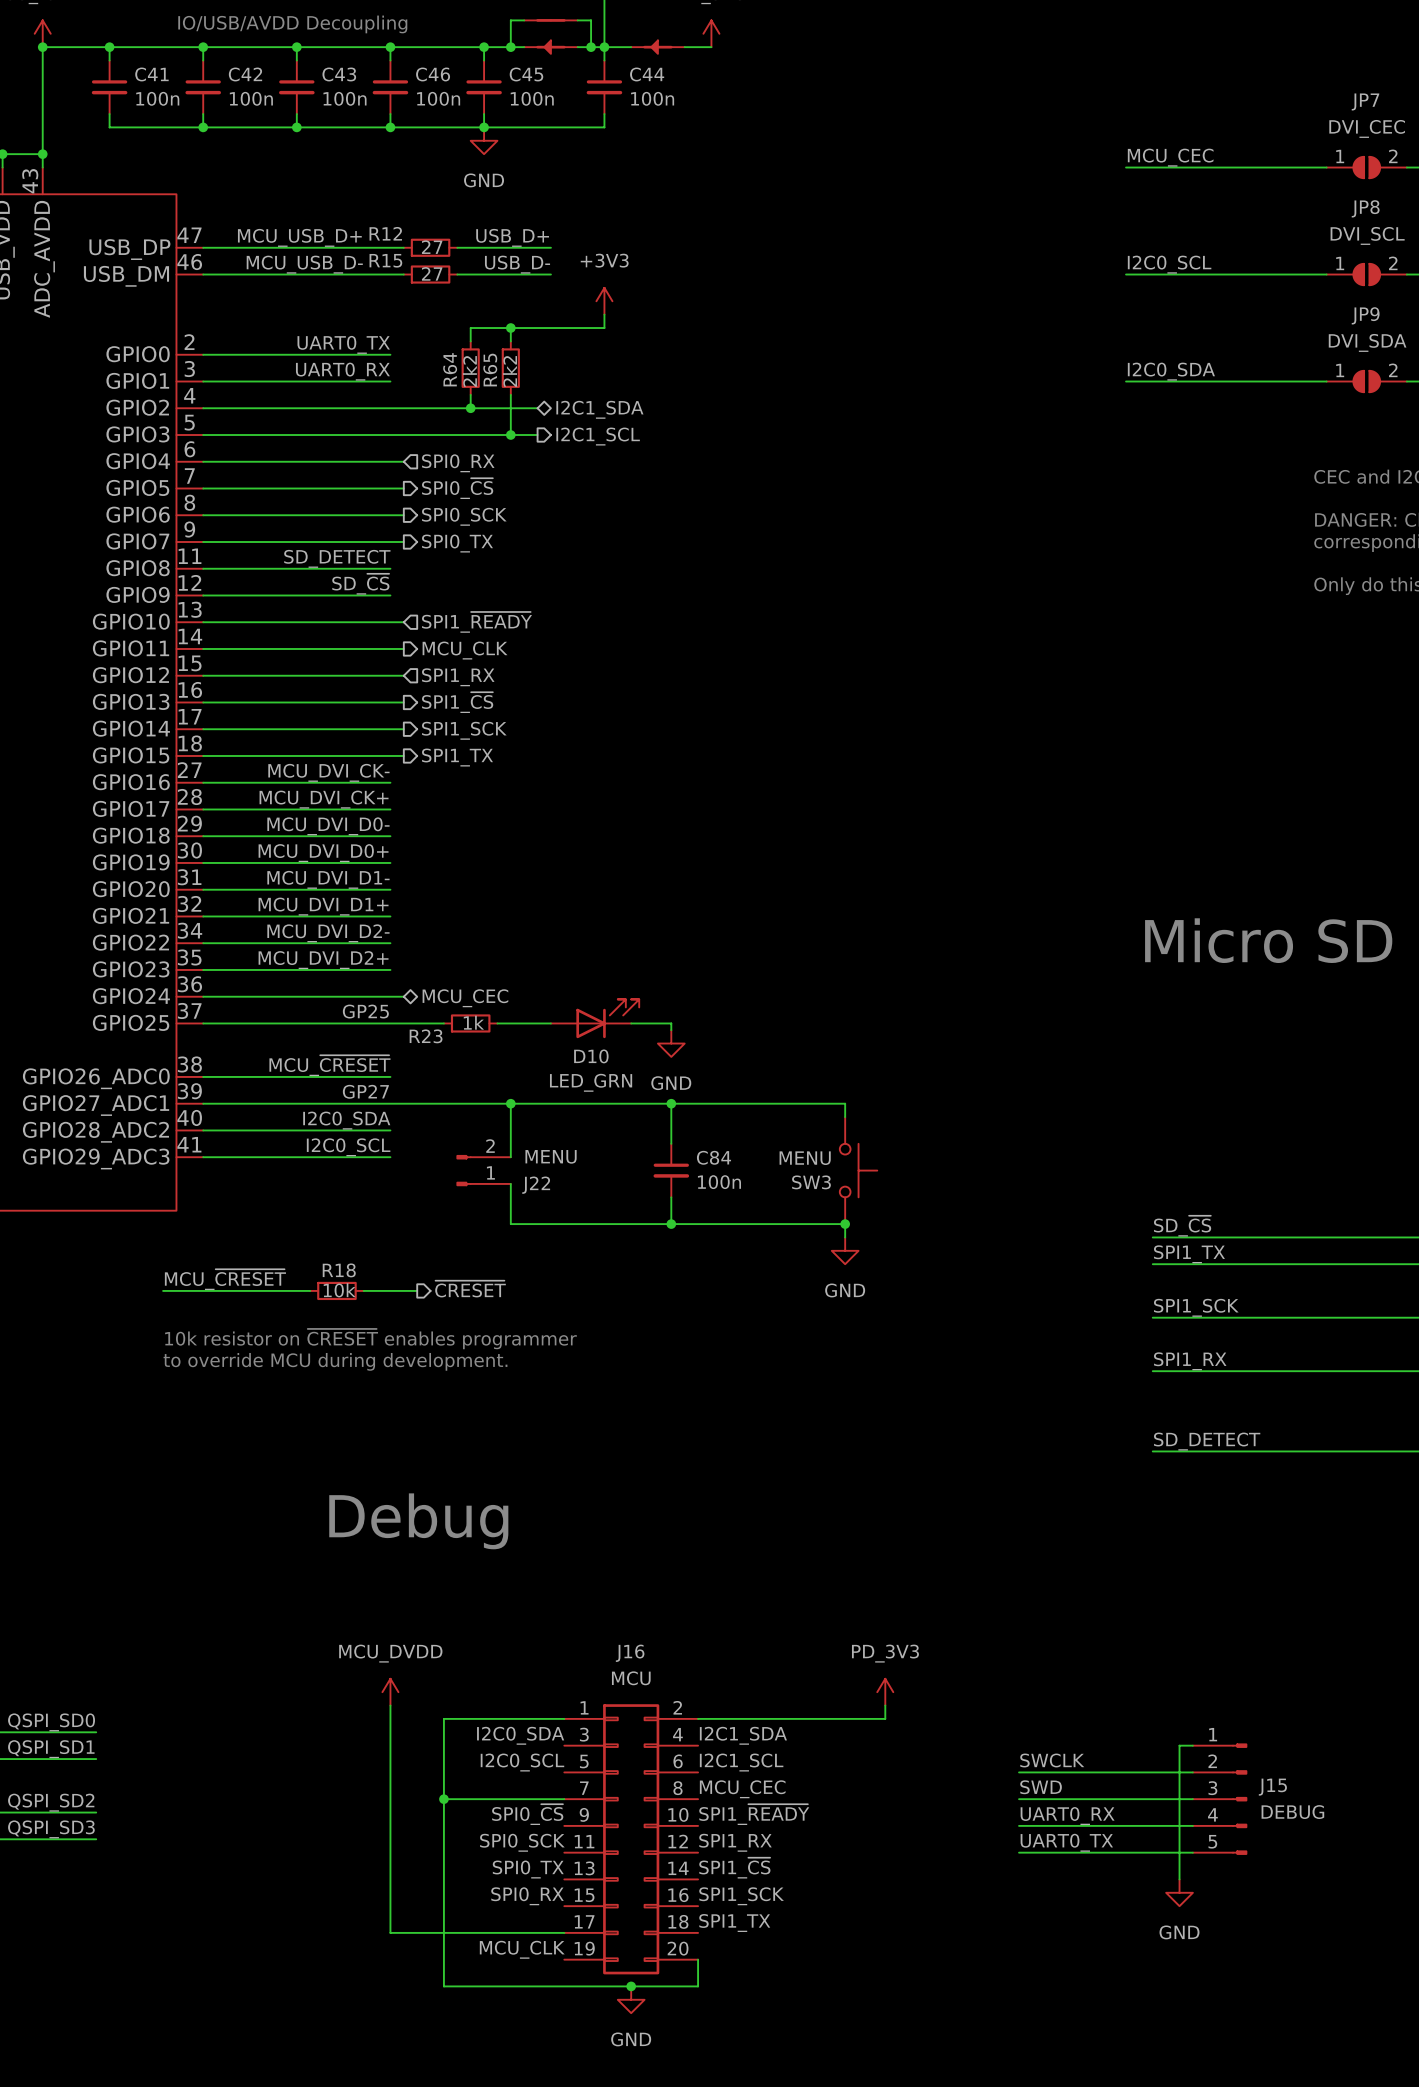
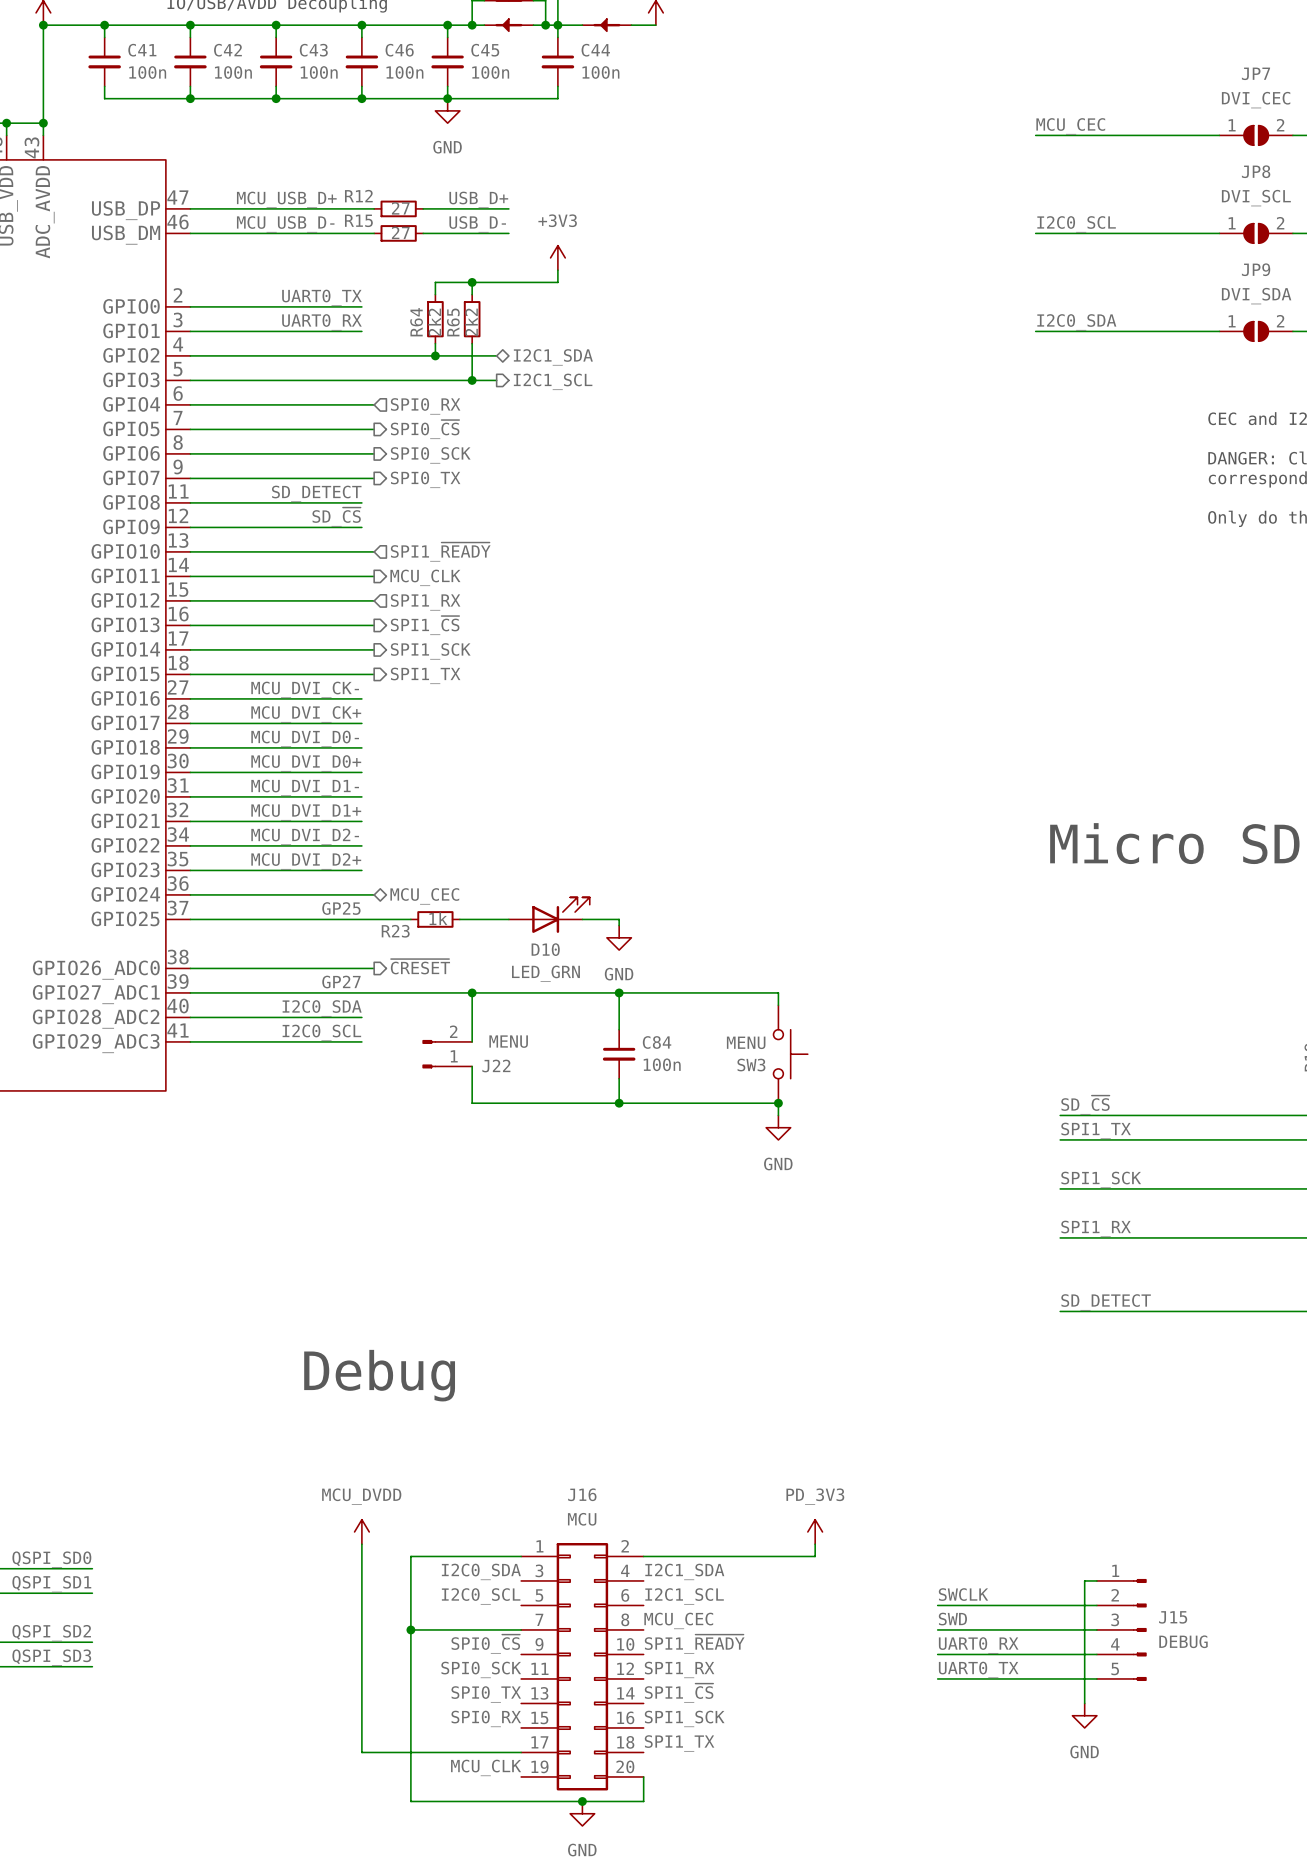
label: MCU_~{CRESET} (329, 1065) -> none
wire: none -> (361, 968) (374, 968)
label: MCU_~{CRESET} (225, 1279) -> none
hierarchical label position: ~{CRESET} (470, 1289) -> ~{CRESET} (420, 966)
wire: (163, 1290) (310, 1290) -> none
R18: 10k (336, 1290) -> none
wire: (363, 1290) (417, 1290) -> none
text: 10k resistor on ~{CRESET} enables programmer (370, 1339) -> none
text: to override MCU during development. (335, 1361) -> none

